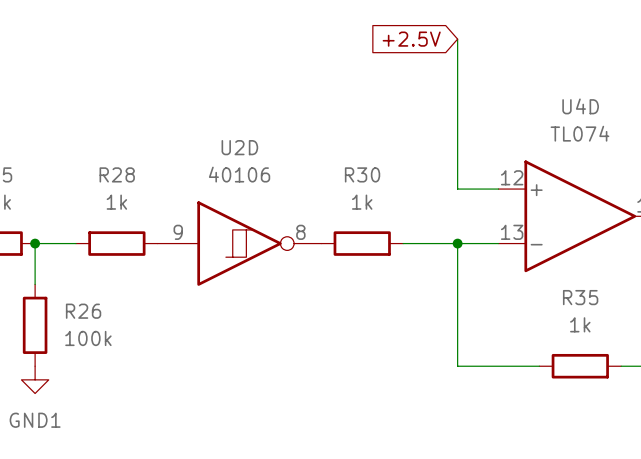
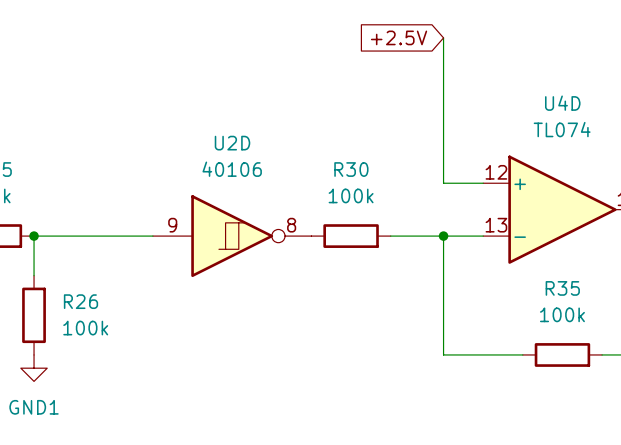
R30 value: 1k (362, 202) -> 100k (351, 195)
wire: none -> (73, 236) (152, 236)
R28: 1k (116, 243) -> none
R35 value: 1k (580, 324) -> 100k (562, 314)

